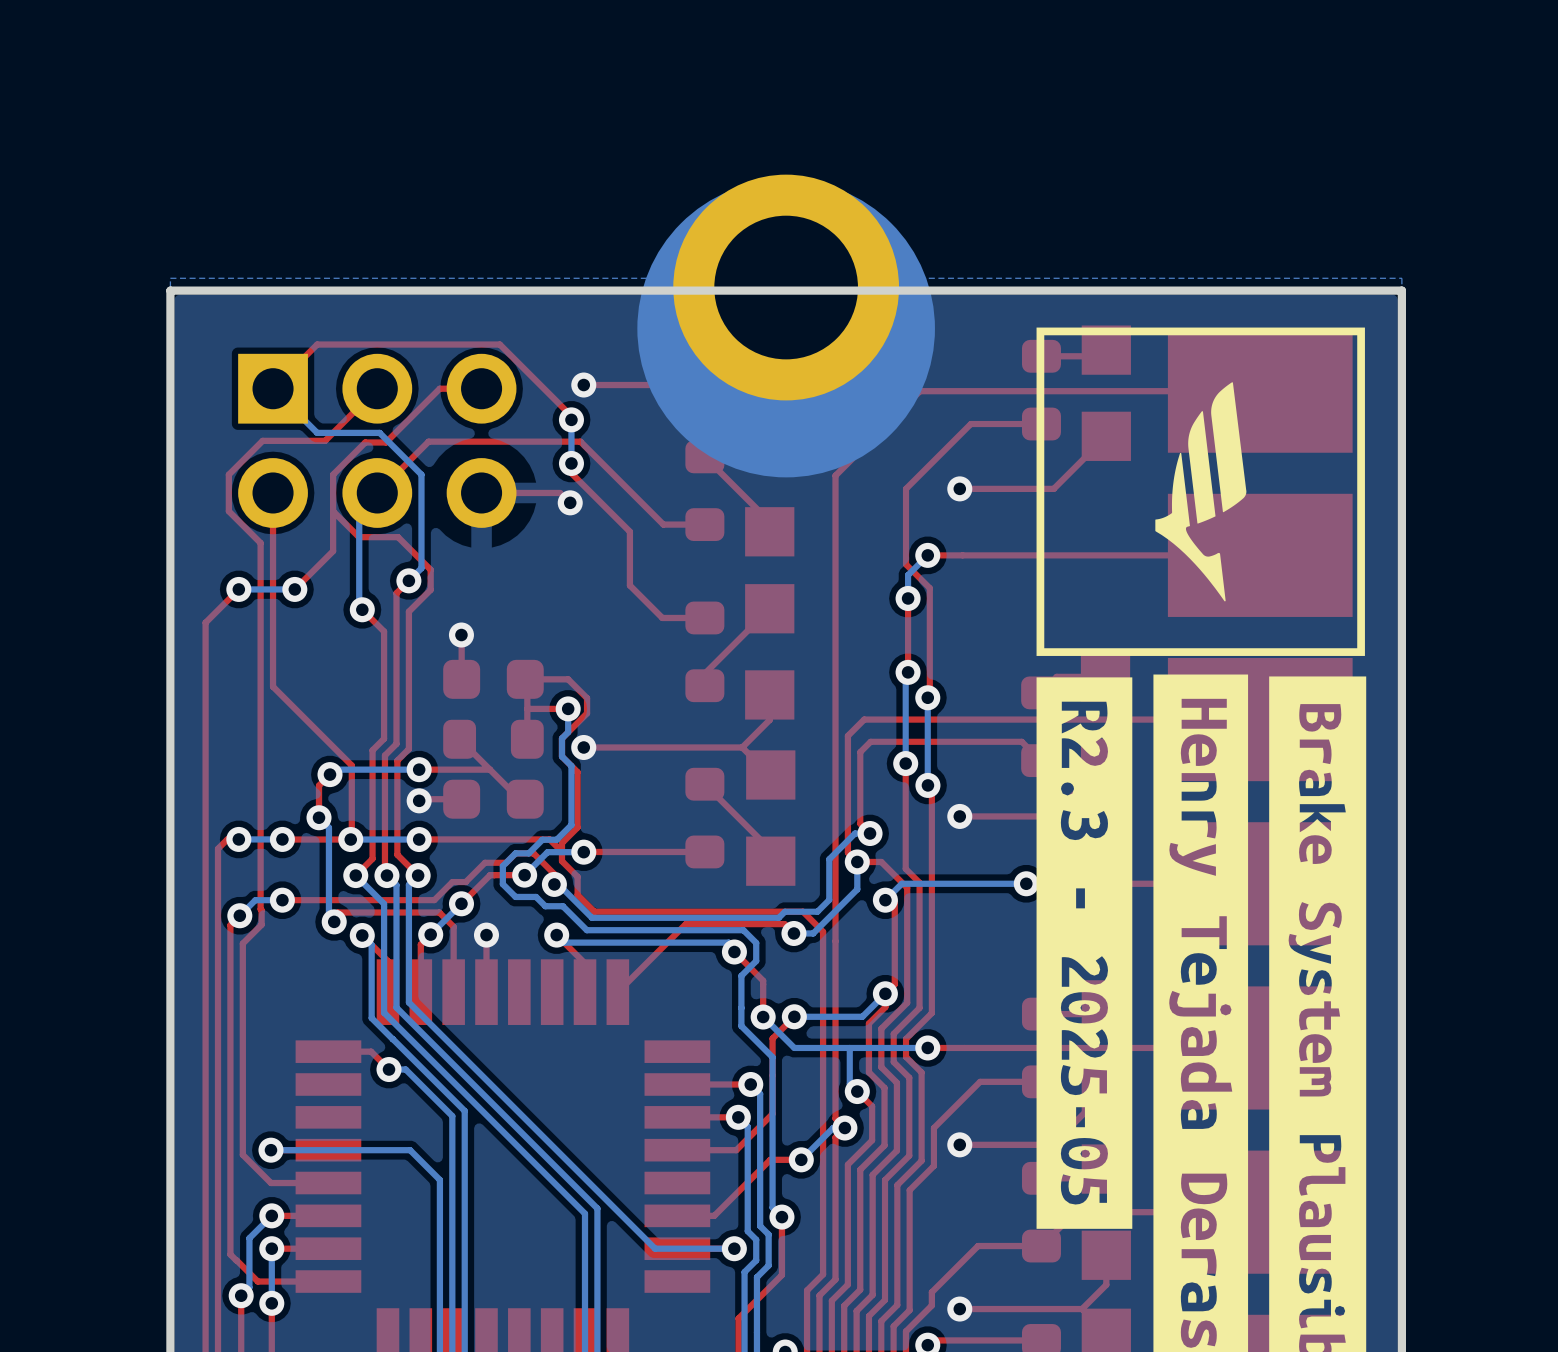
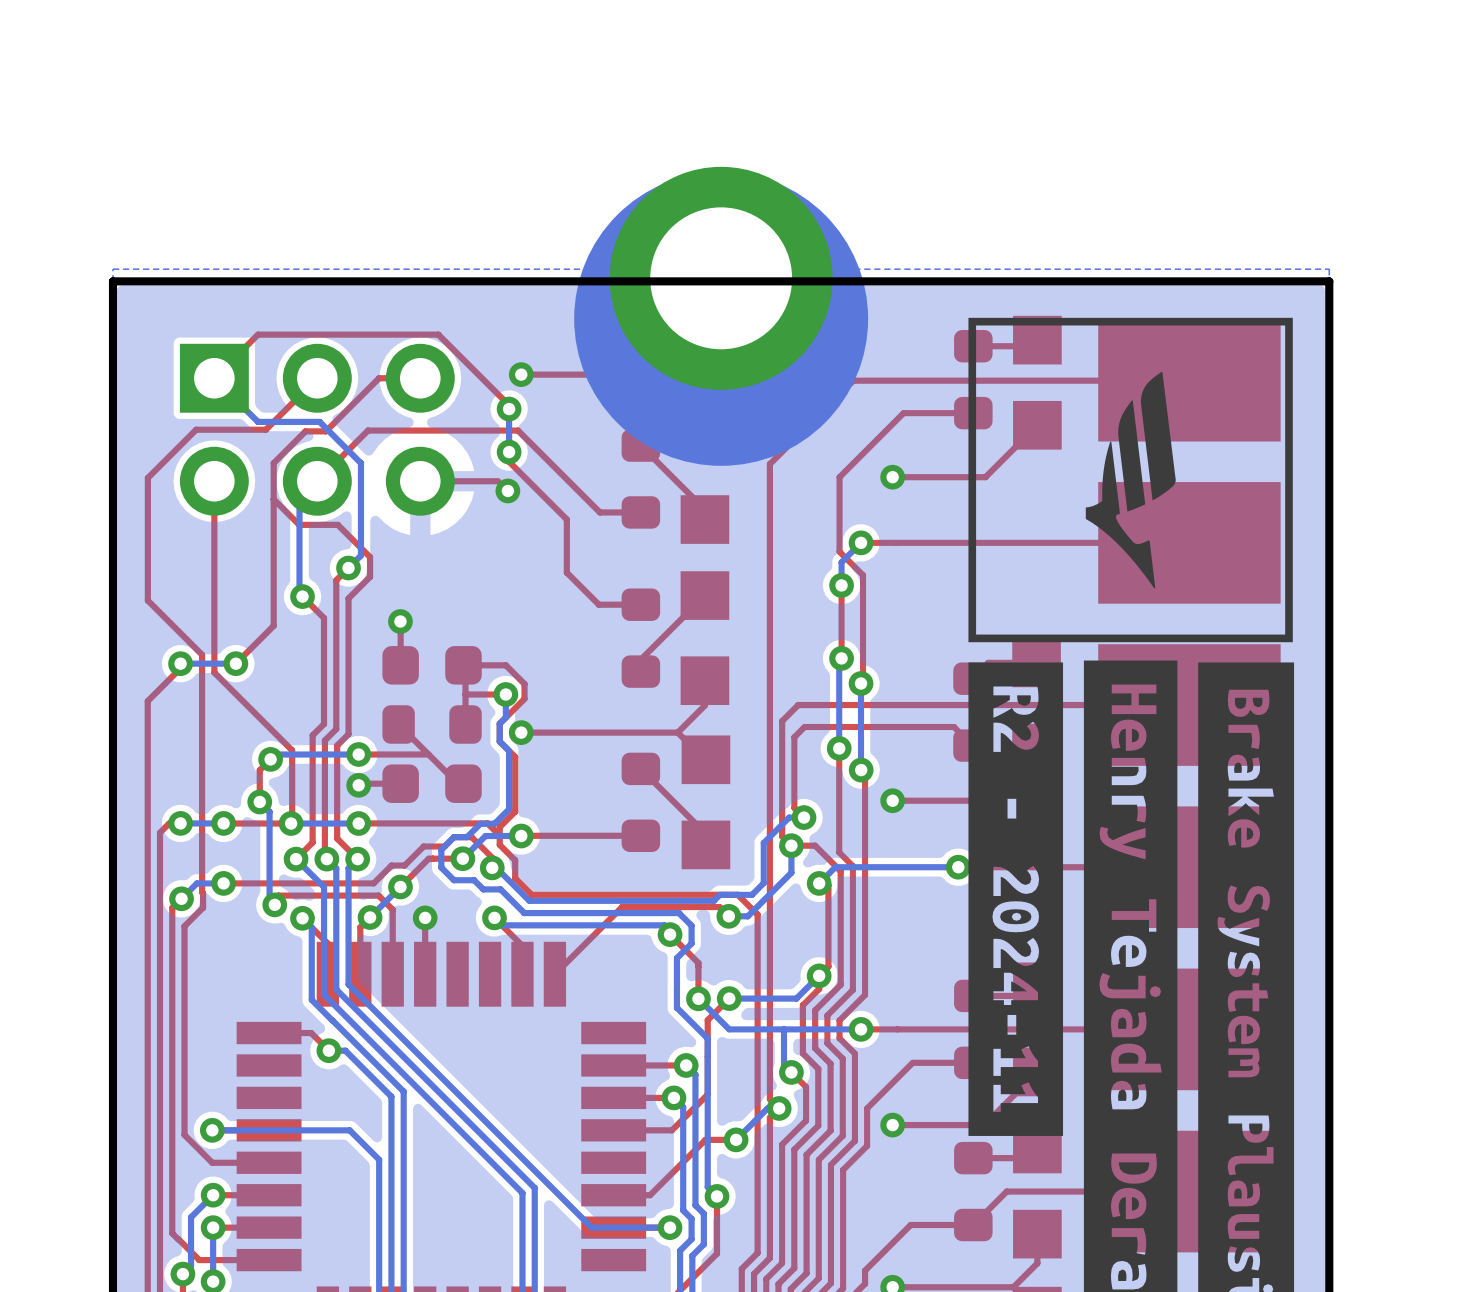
top track: (262, 440) (228, 474) (228, 511) (260, 543) (260, 668) -> (204, 429) (196, 429) (147, 478) (147, 600) (202, 654)
top track: (333, 551) (294, 589) -> (273, 538) (273, 625) (235, 663)
top track: (238, 589) (205, 622) (205, 715) -> (180, 663) (180, 668) (147, 701)
via: (238, 589) -> none
bottom track: (294, 589) (238, 589) -> (235, 663) (180, 663)
via: (294, 589) -> none
via: none -> (180, 663)
via: none -> (235, 663)
drawing shape: [1036, 677, 1133, 1229] -> [968, 662, 1064, 1136]

